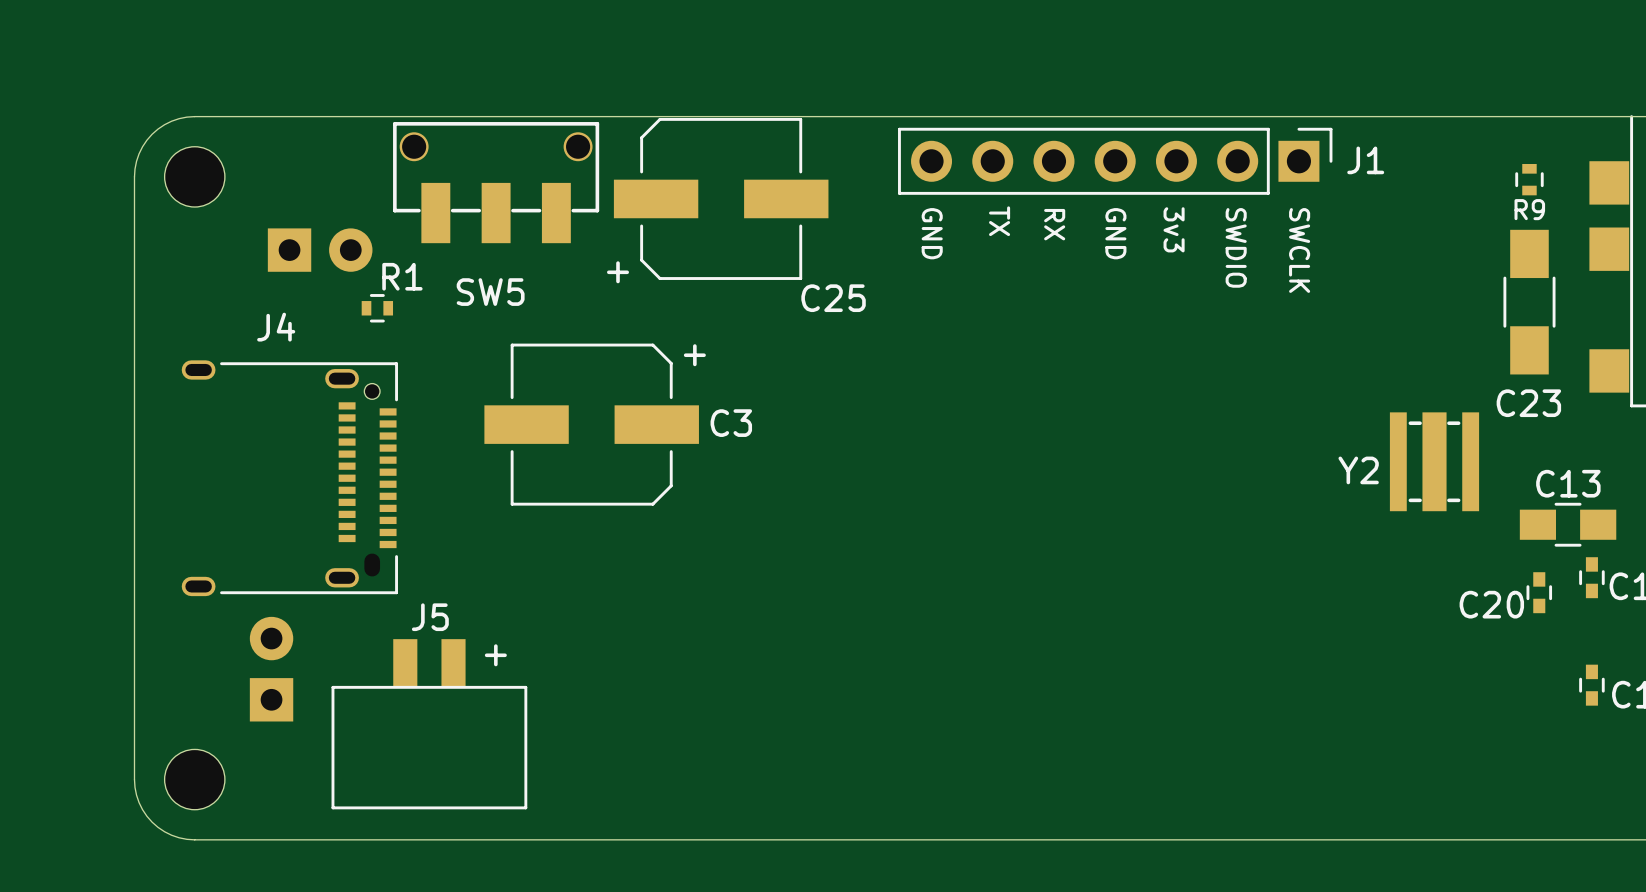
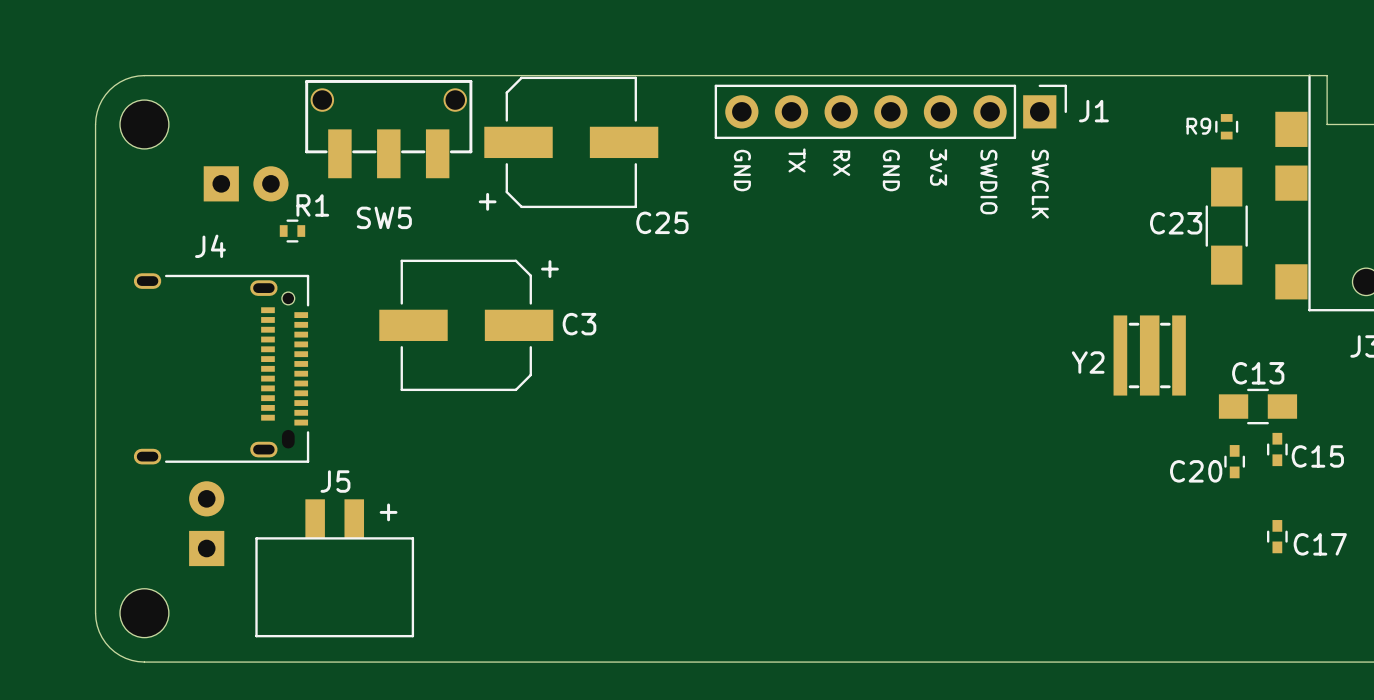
R9 name position: R9 (1529, 209) -> R9 (1198, 126)
C23 name position: C23 (1528, 403) -> C23 (1176, 223)

